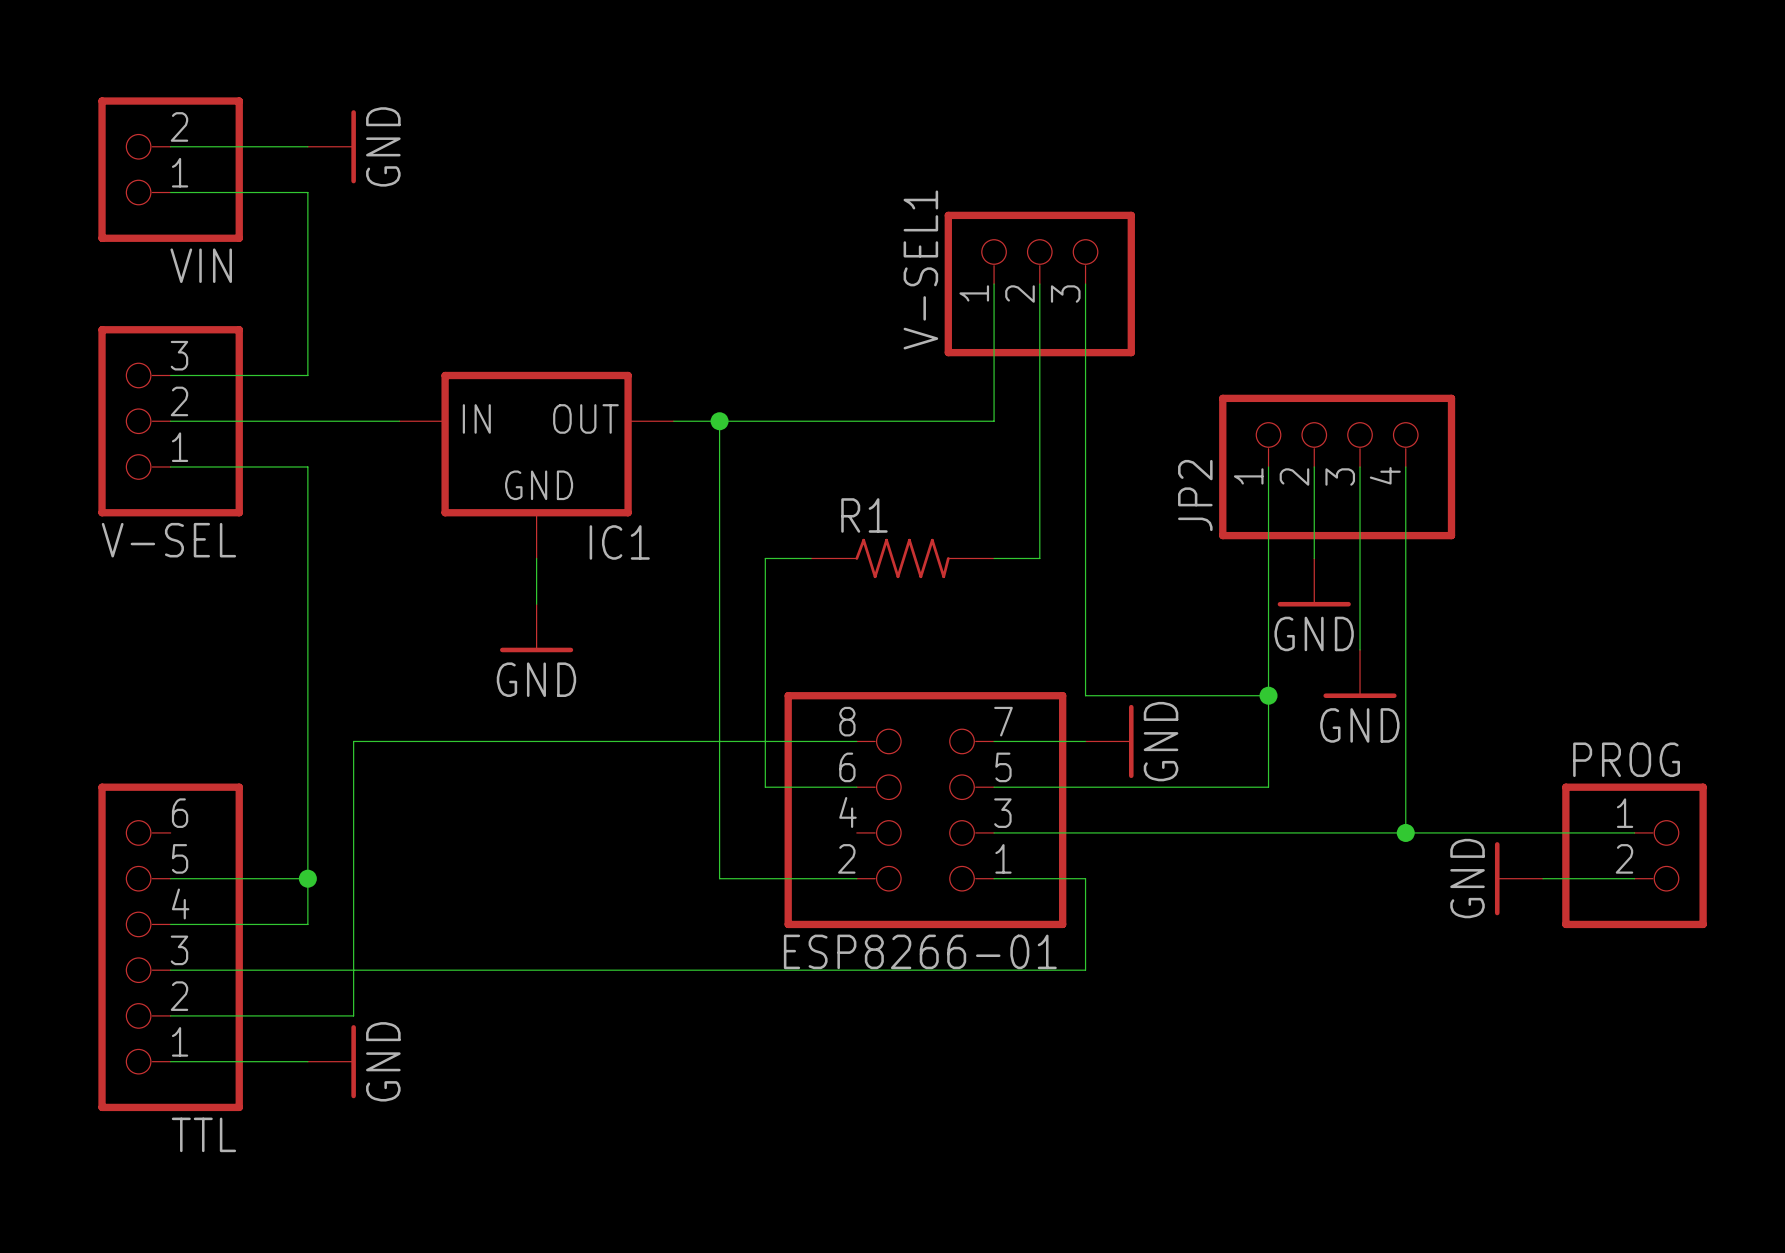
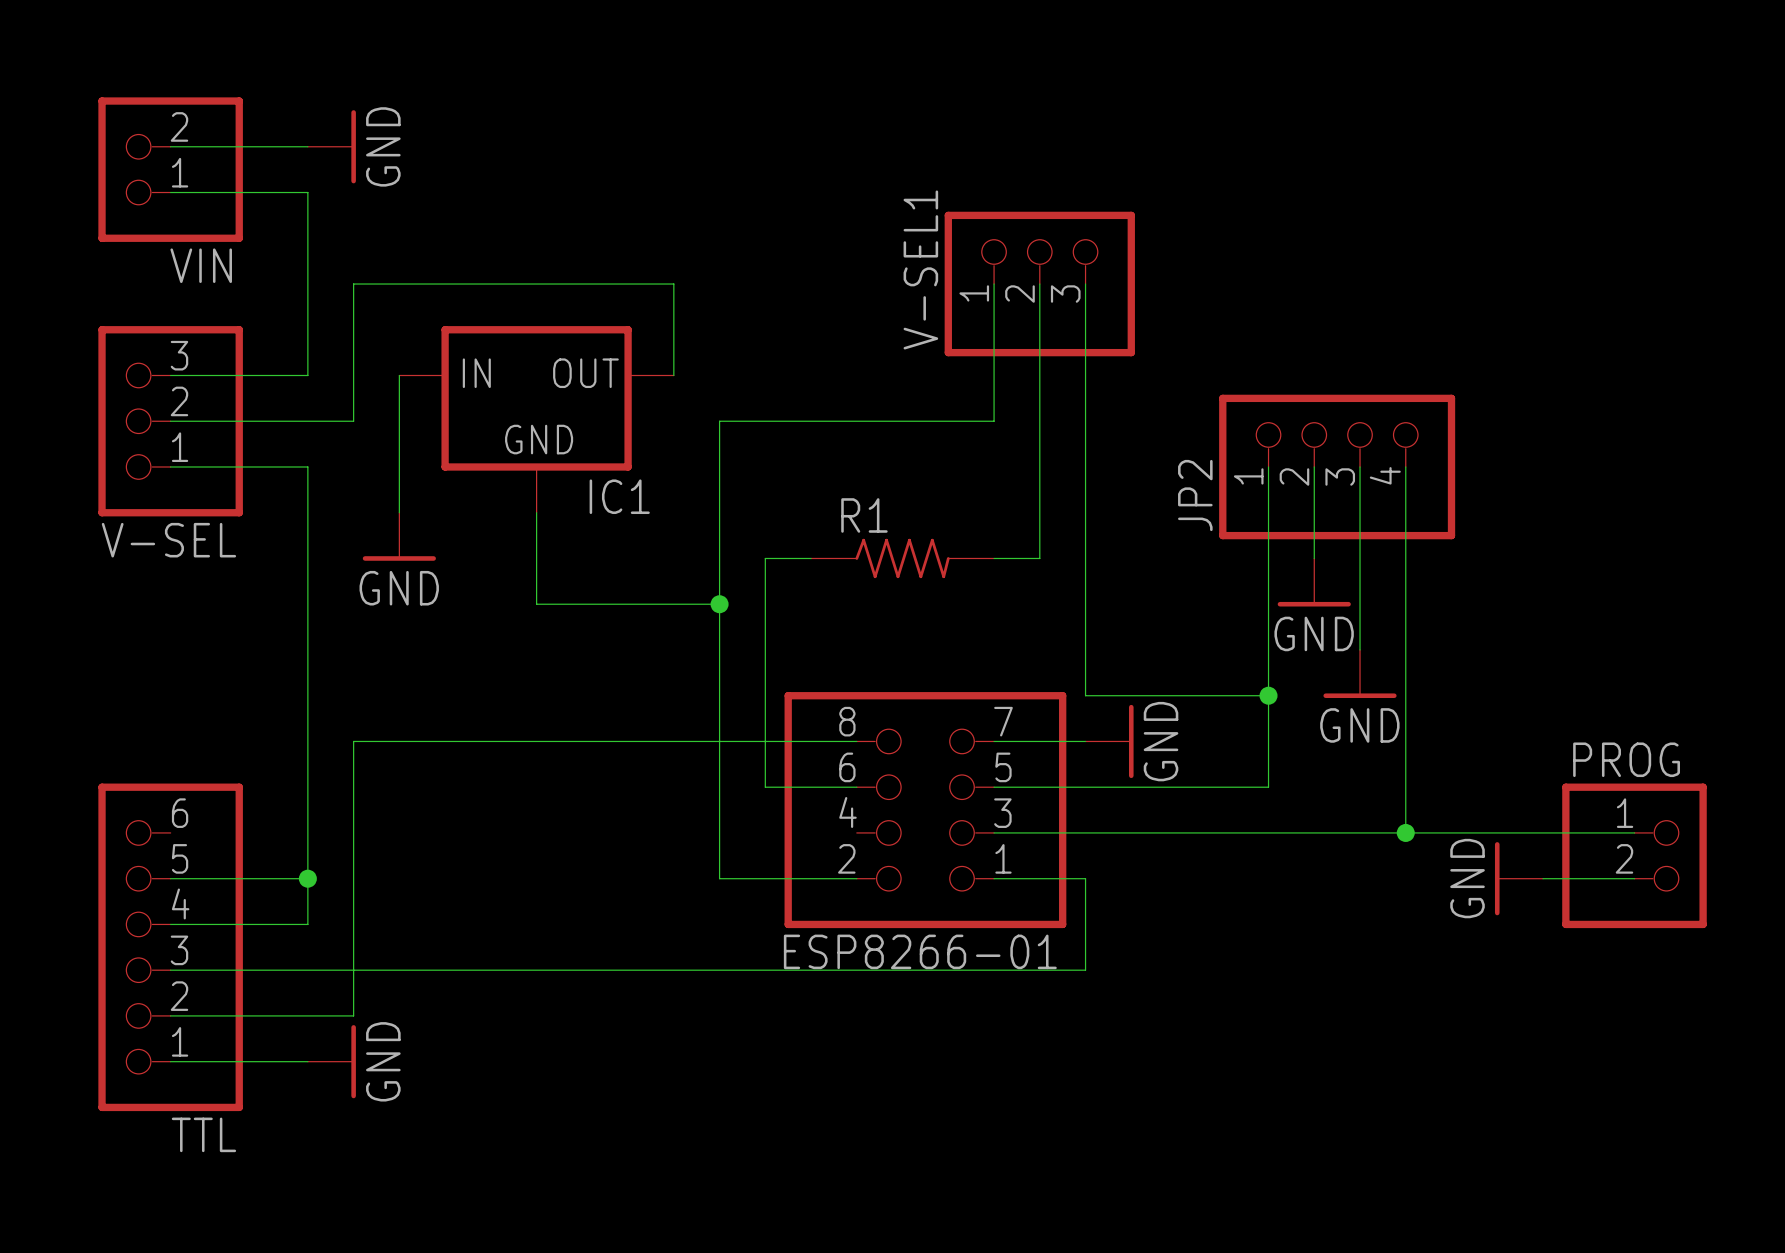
wire: none -> (399, 375) (399, 512)
wire: (353, 421) (399, 421) -> (353, 421) (353, 284) (673, 284) (673, 375)
wire: (673, 421) (719, 421) -> none
junction: (719, 421) -> none
IC1 position: (536, 465) -> (536, 419)
wire: none -> (536, 604) (719, 604)
junction: none -> (719, 604)
power symbol position: GND (536, 628) -> GND (399, 536)

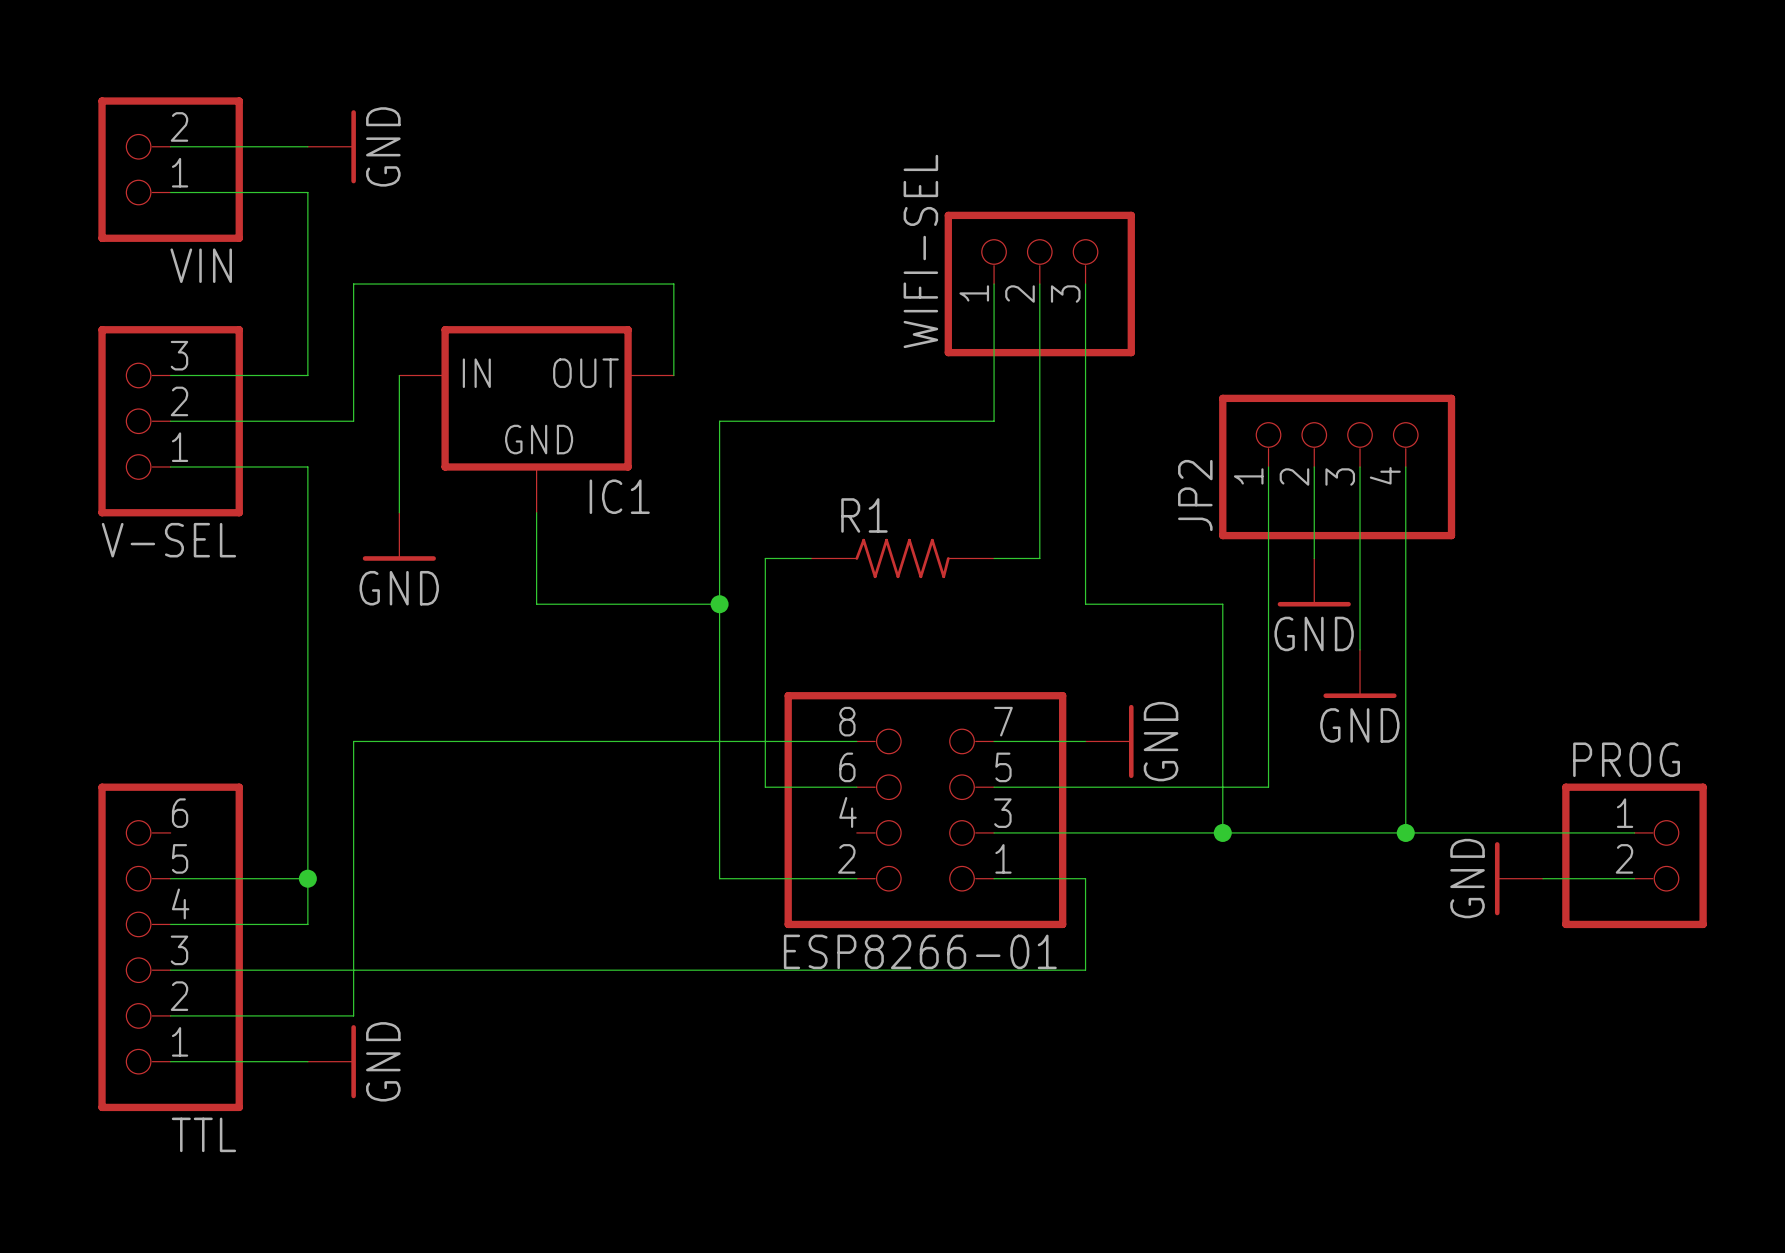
V-SEL1 name: V-SEL1 (920, 269) -> WIFI-SEL (920, 251)
wire: (1085, 604) (1085, 695) (1268, 695) -> (1085, 604) (1222, 604) (1222, 832)
junction: (1268, 695) -> none
junction: none -> (1222, 832)

